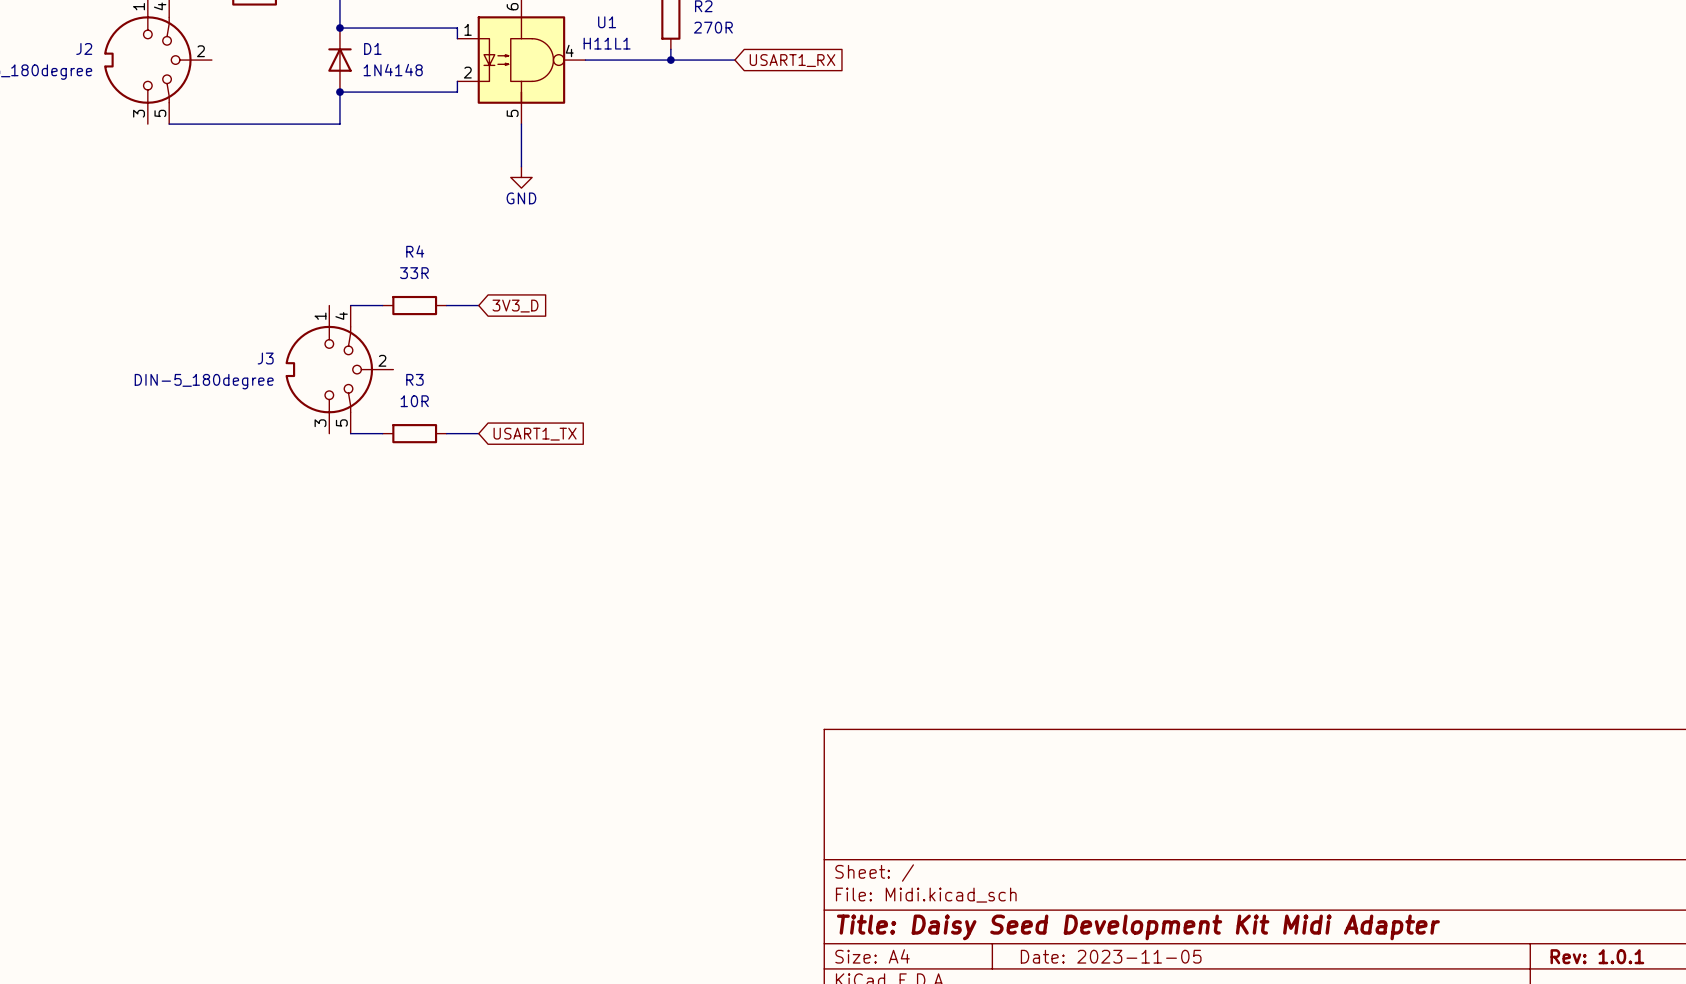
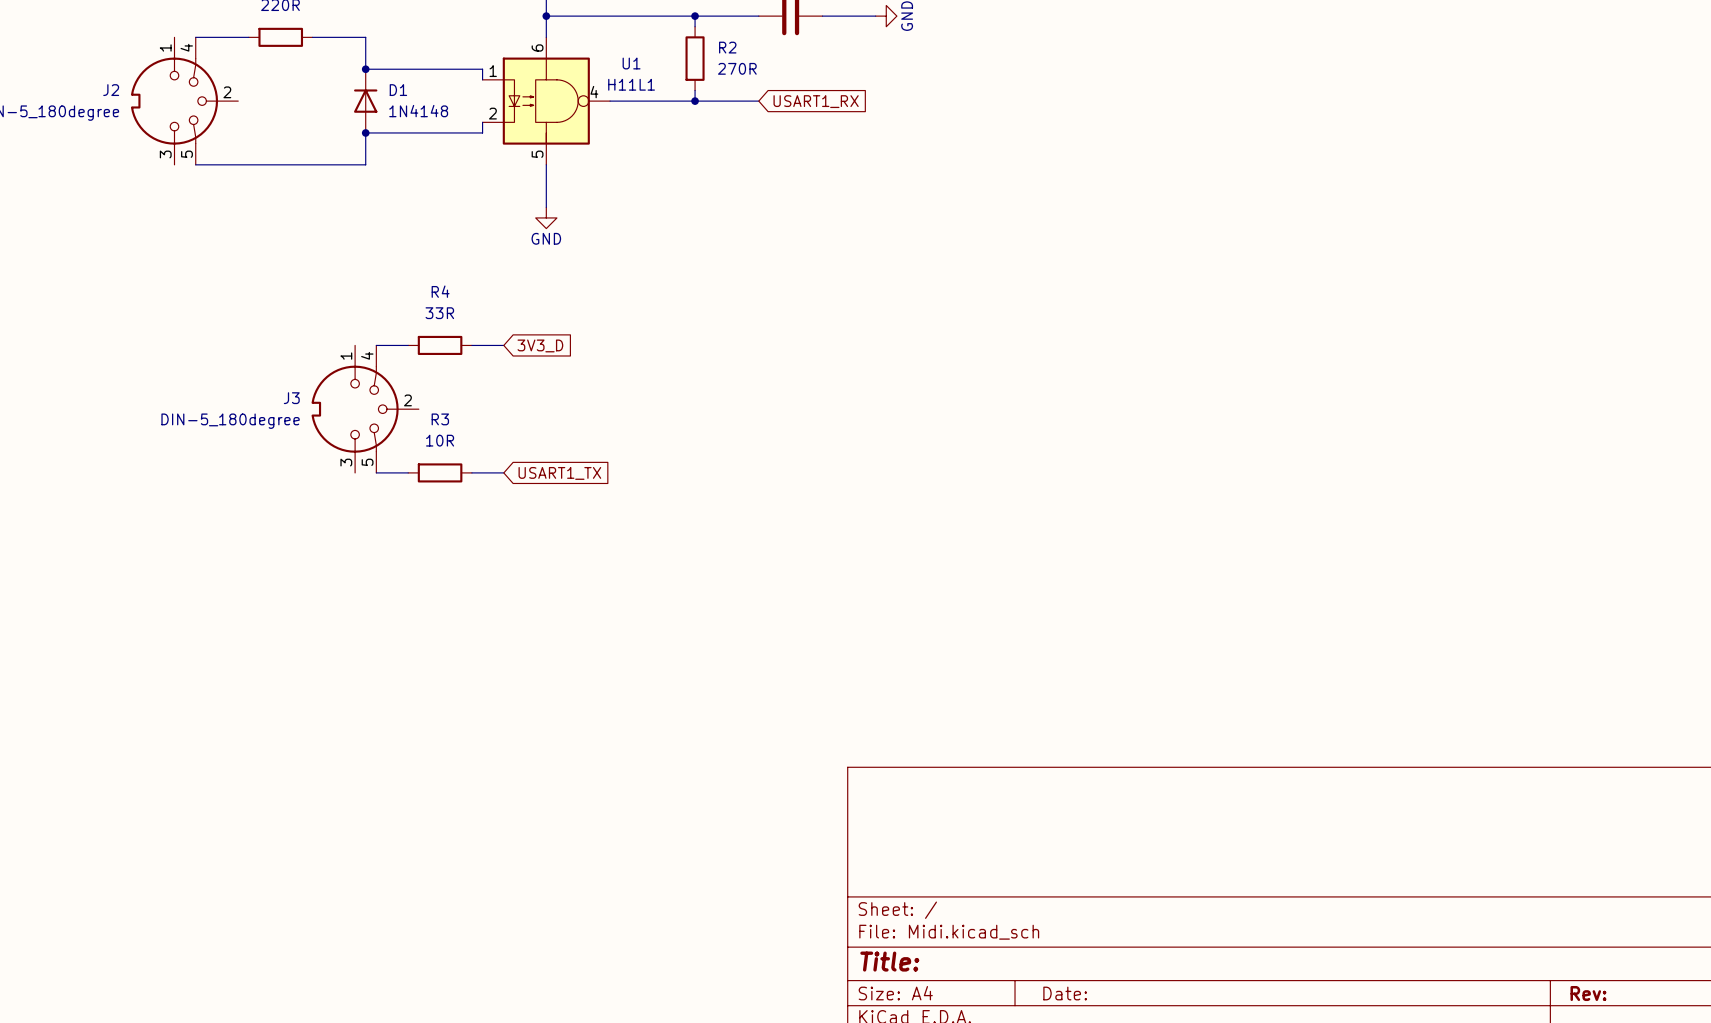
title block: Title: Daisy Seed Development Kit Midi Adapter (1138, 927) -> Title: (889, 961)
title block: Date: 2023-11-05 (1111, 956) -> Date: (1065, 993)
title block: Rev: 1.0.1 (1597, 956) -> Rev: (1588, 993)

